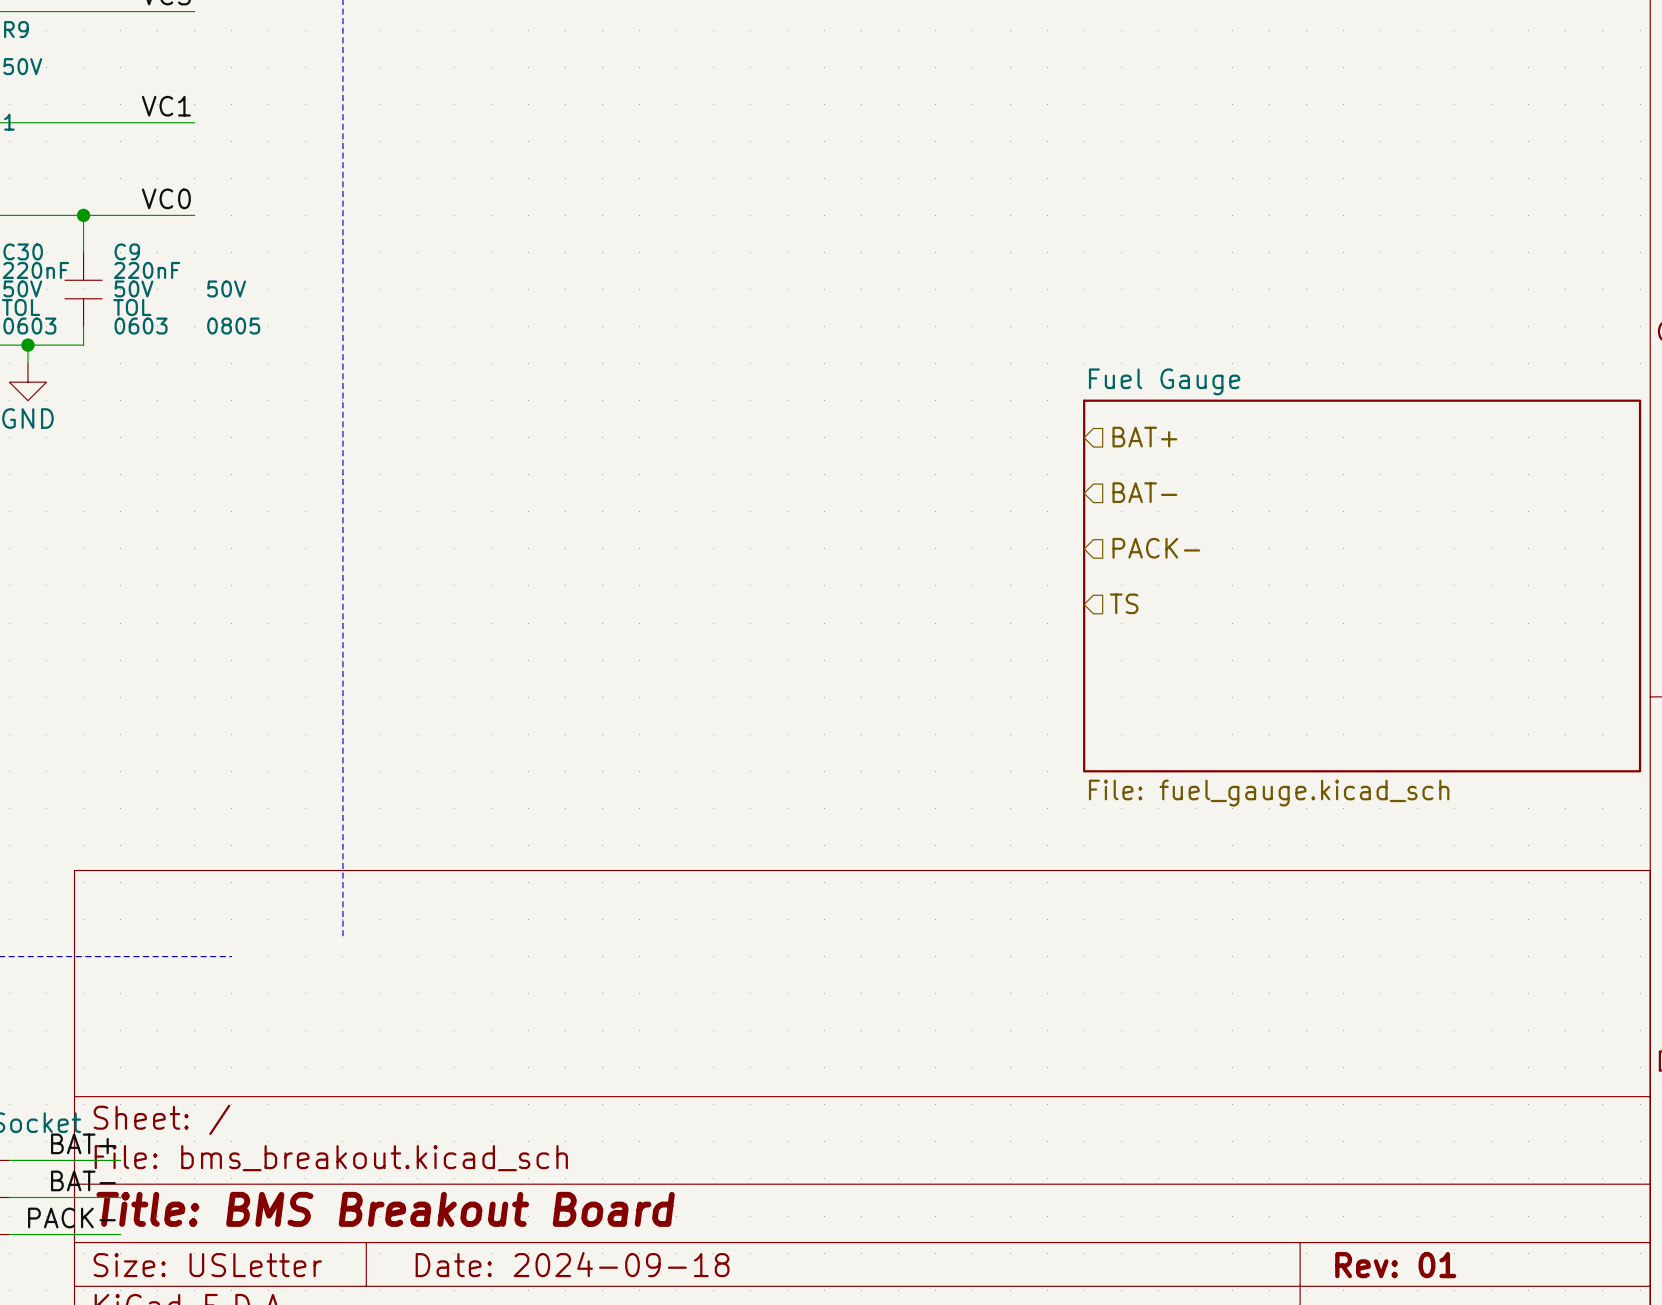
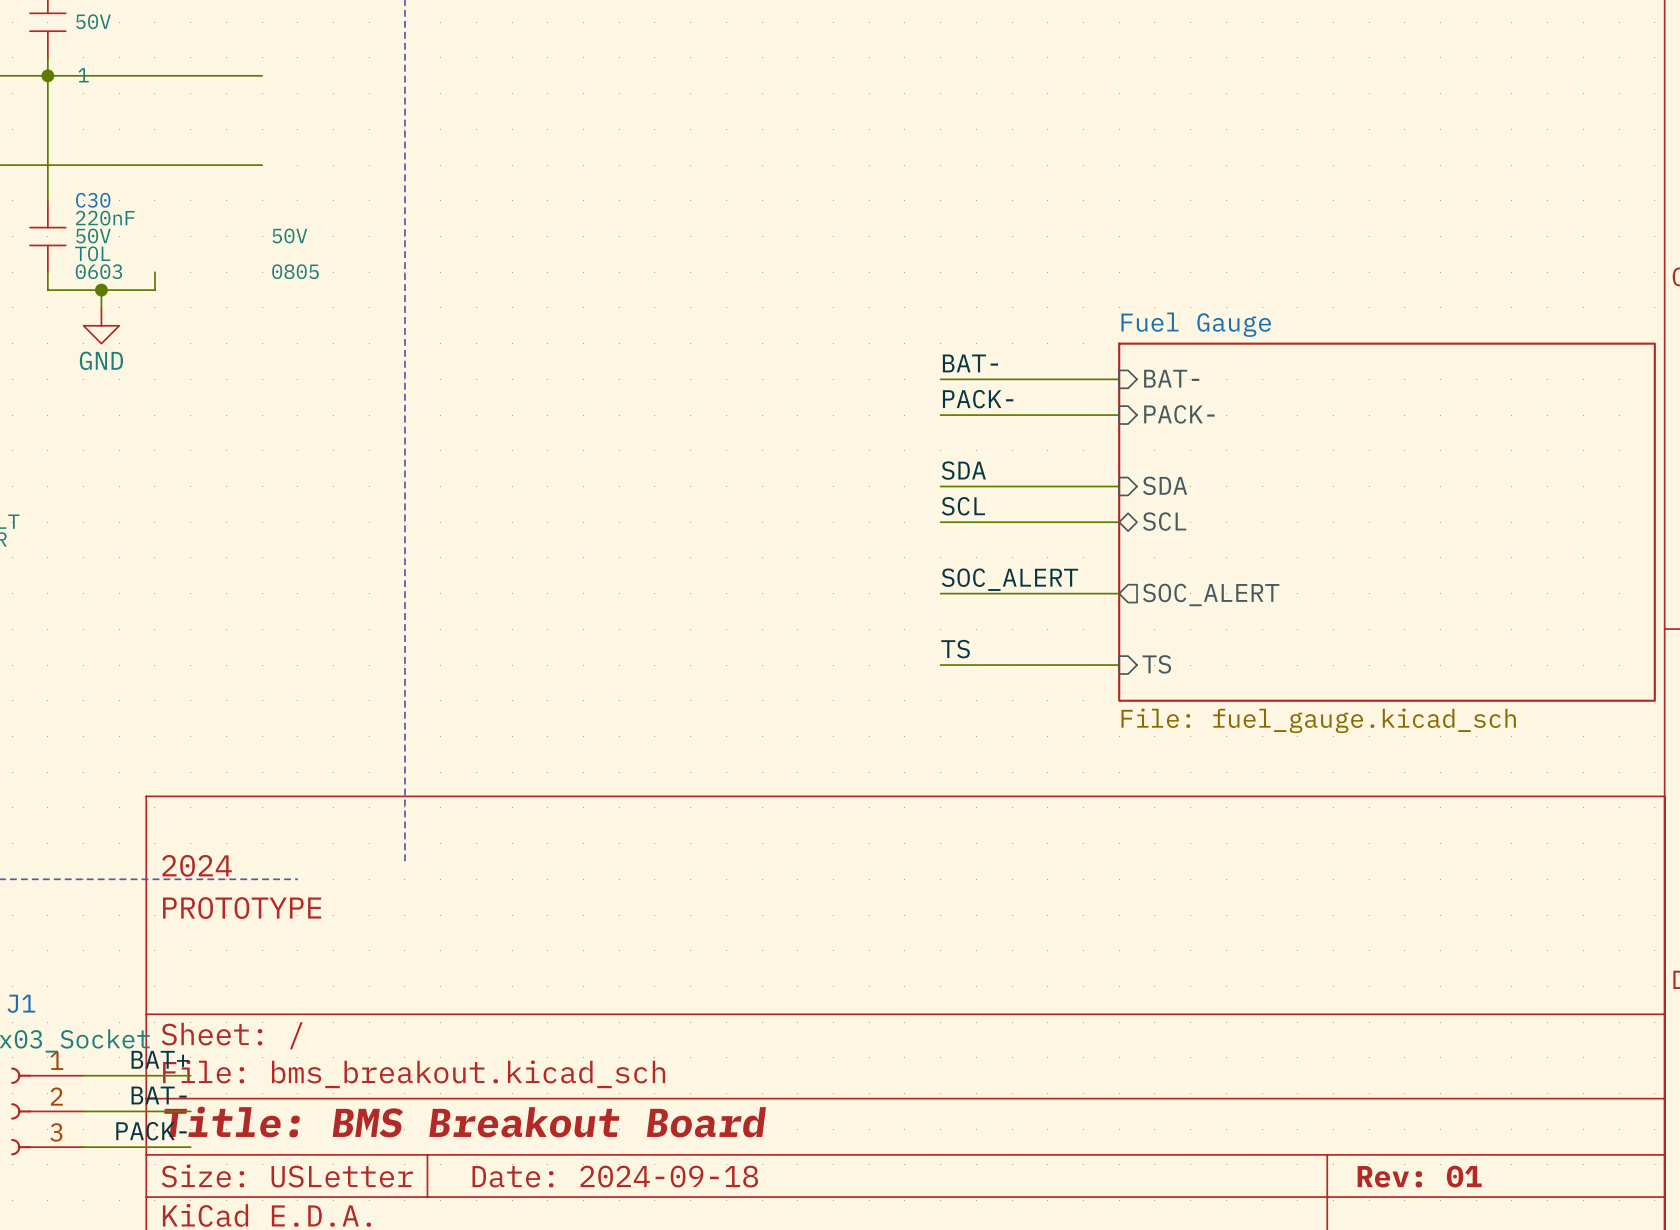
label: VC1 (166, 106) -> none
label: VC0 (166, 198) -> none
wire: (83, 215) (83, 252) -> none
junction: (83, 215) -> none
C9: 220nF (83, 289) -> none
label: none -> BAT- (970, 363)
wire: none -> (940, 379) (1119, 379)
hierarchical label: BAT+ (1144, 437) -> none
sheet pin: none -> BAT- (1171, 378)
label: none -> PACK- (978, 399)
wire: none -> (940, 415) (1119, 415)
sheet pin: none -> PACK- (1179, 414)
hierarchical label: BAT- (1144, 492) -> none
label: none -> SDA (963, 470)
wire: none -> (940, 486) (1119, 486)
sheet pin: none -> SDA (1165, 485)
hierarchical label: PACK- (1156, 548) -> none
label: none -> SCL (963, 506)
wire: none -> (940, 522) (1119, 522)
sheet pin: none -> SCL (1164, 521)
hierarchical label: TS (1124, 603) -> none
label: none -> SOC_ALERT (1009, 579)
wire: none -> (940, 593) (1119, 593)
sheet pin: none -> SOC_ALERT (1211, 594)
label: none -> TS (955, 649)
sheet pin: none -> TS (1156, 664)
wire: none -> (940, 665) (1119, 665)
title block: none -> 2024 (197, 865)
title block: none -> PROTOTYPE (242, 908)

